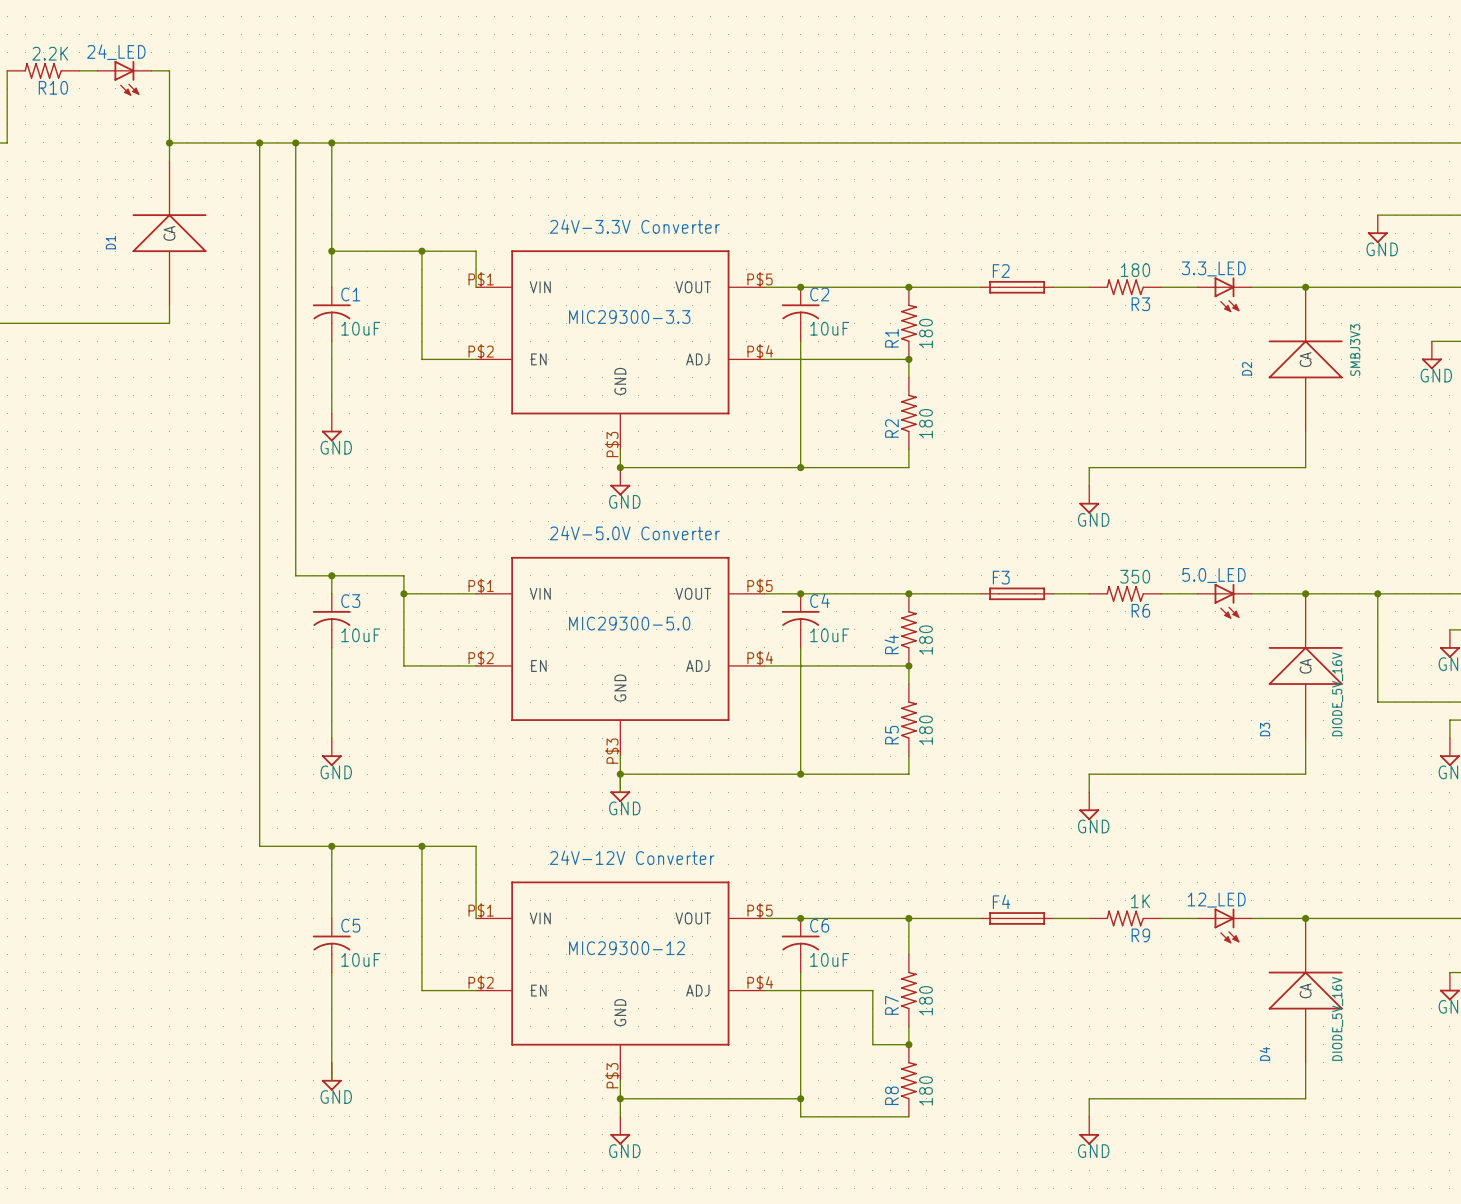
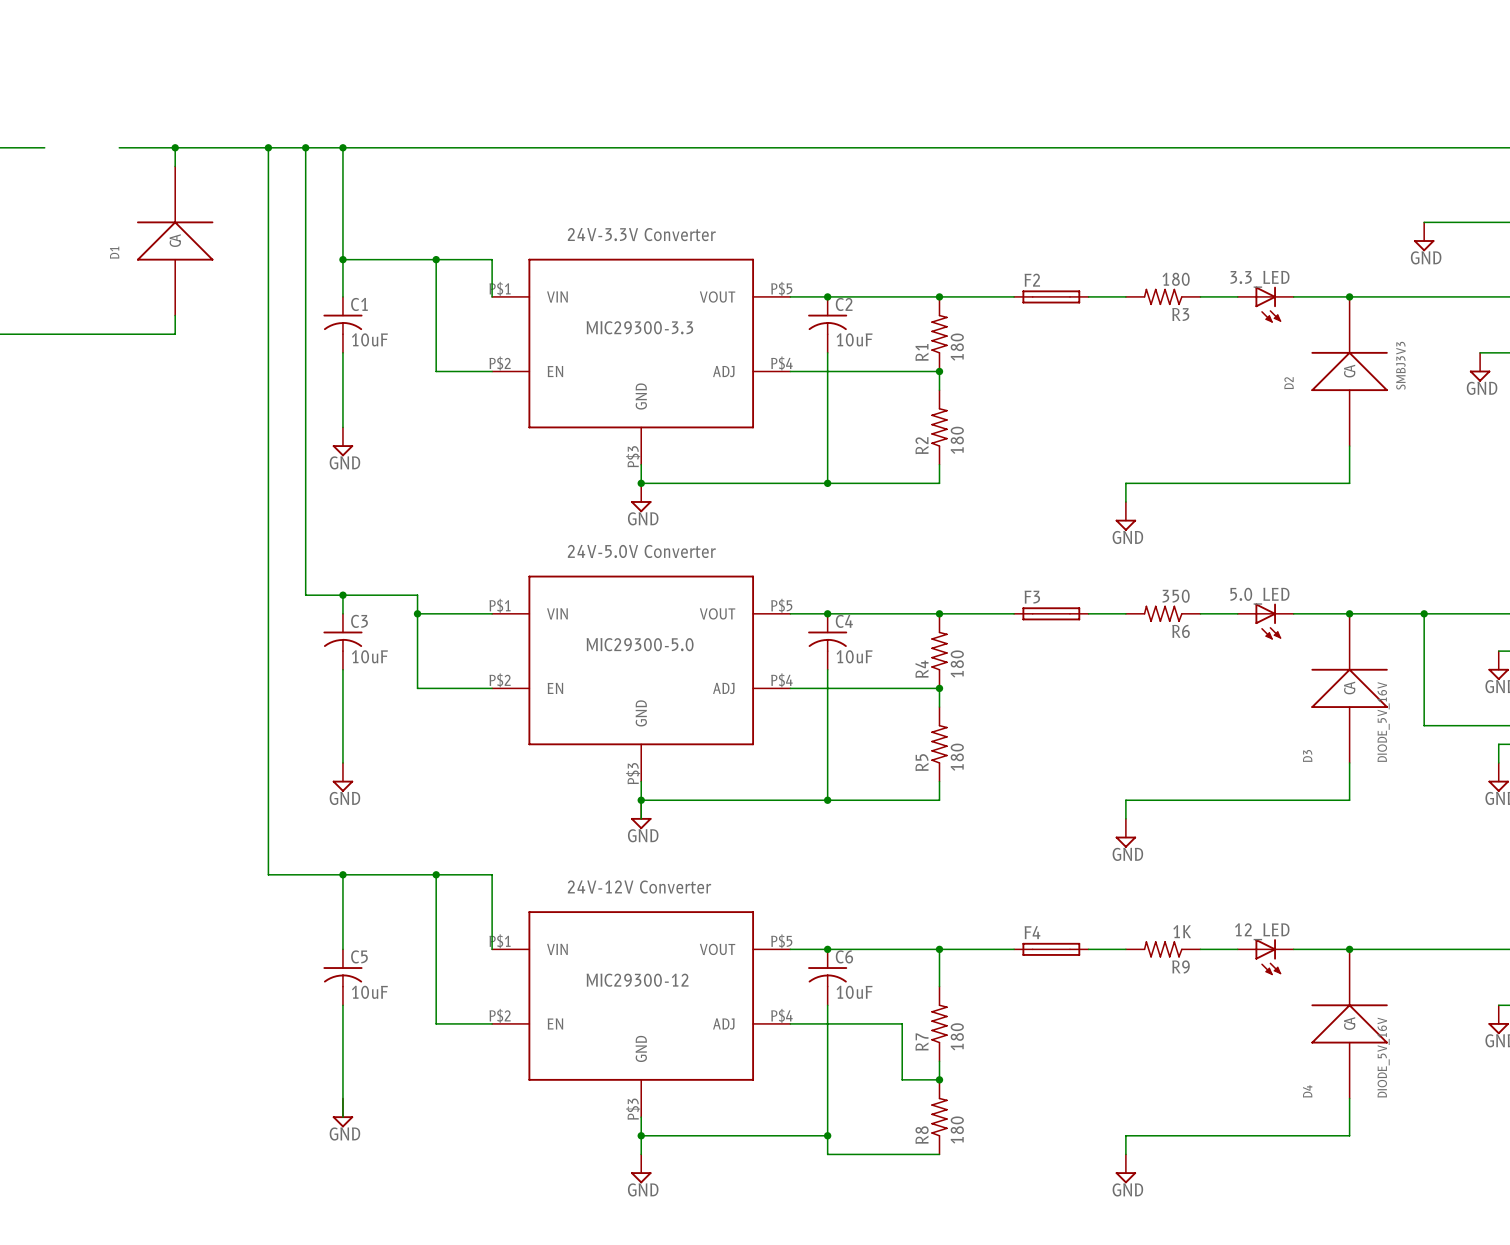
wire: (7, 70) (7, 142) -> (44, 147) (7, 147)
R10: 2.2K (43, 70) -> none
wire: (79, 70) (97, 70) -> none
wire: (151, 70) (169, 70) (169, 142) -> (119, 147) (175, 147)
24_LED: (124, 78) -> none

